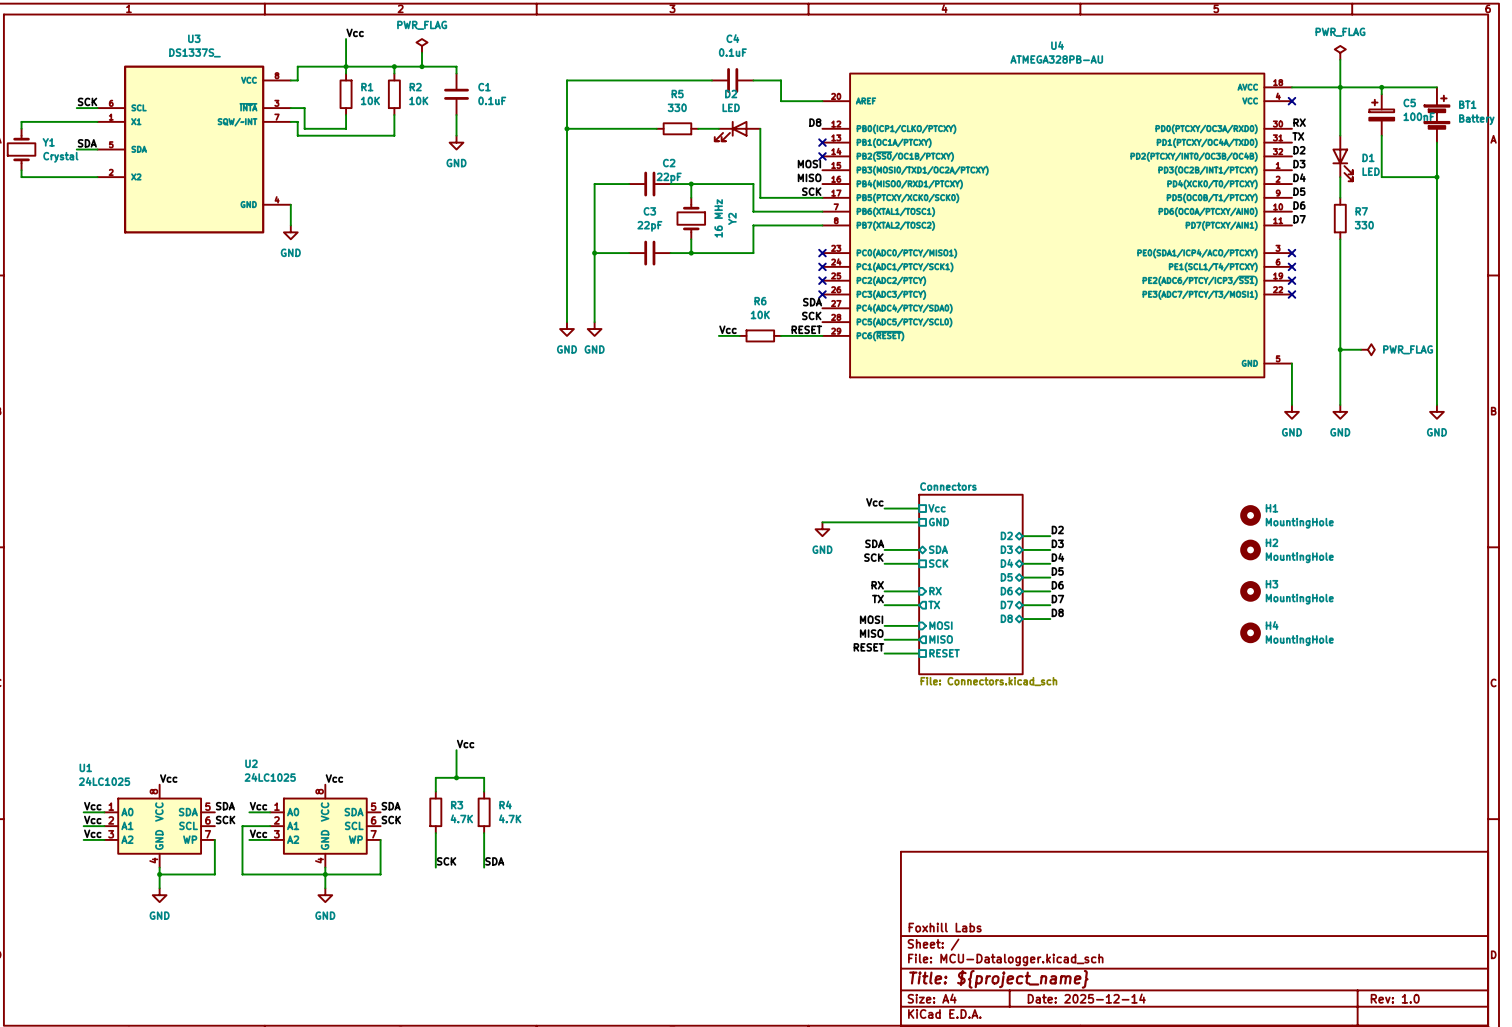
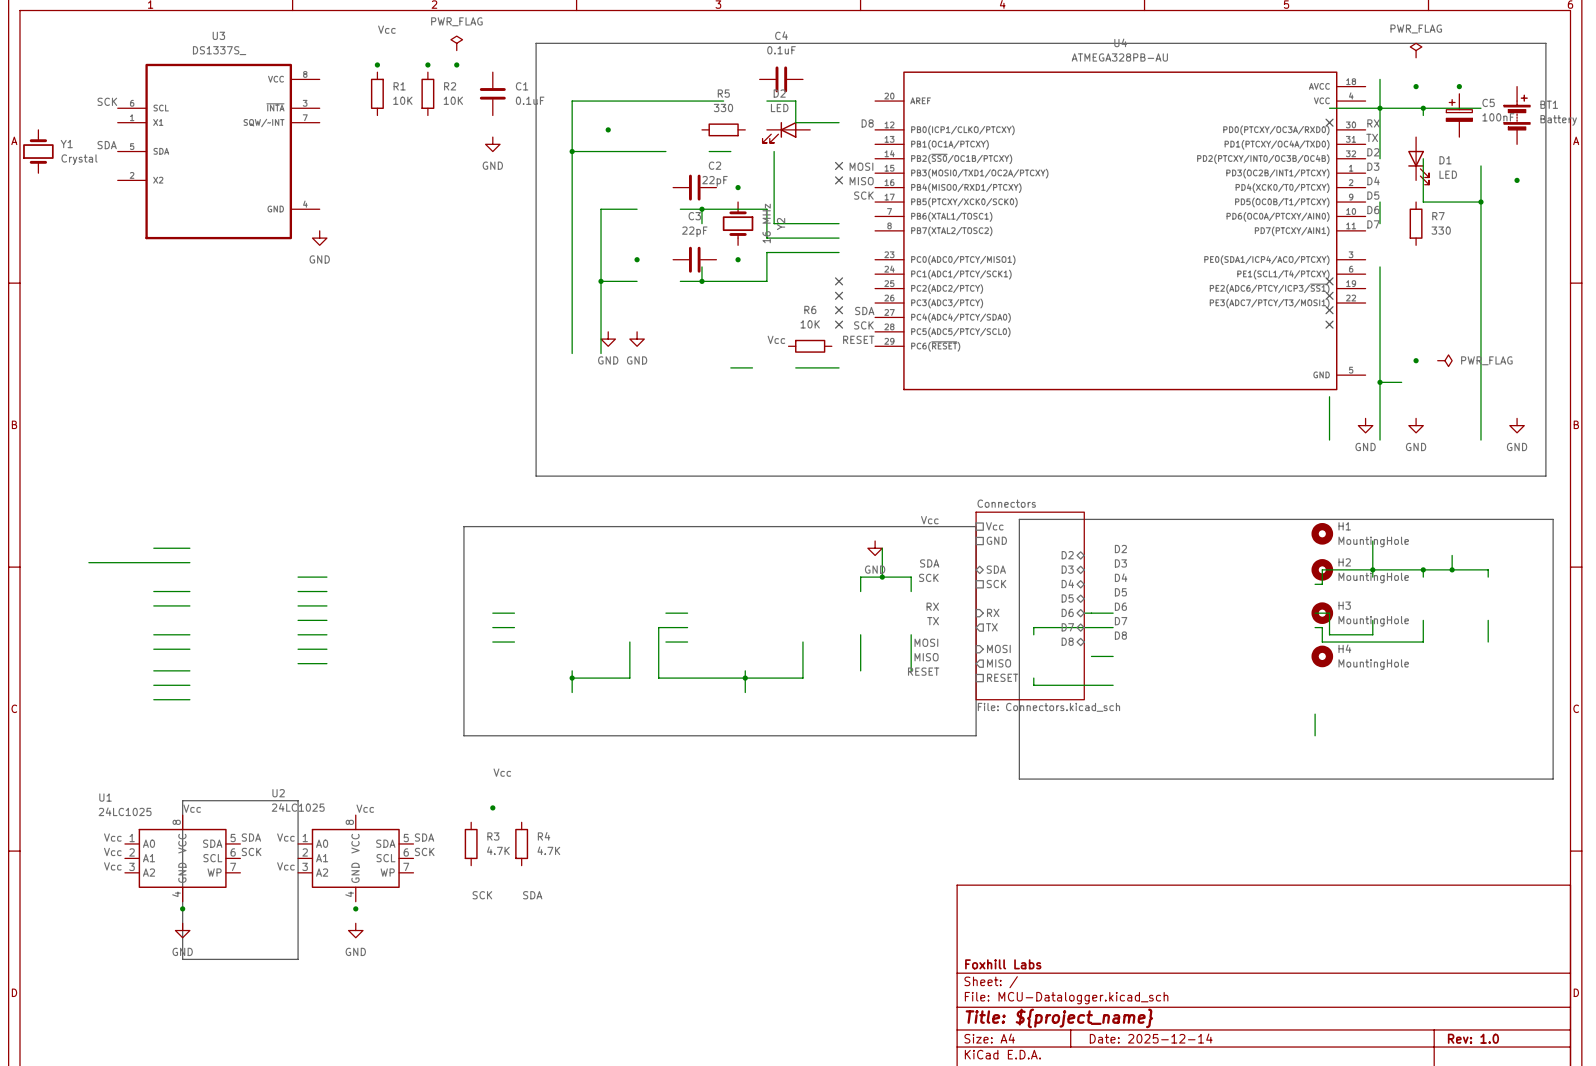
wire: (346, 39) (346, 73) -> none
line: none -> (536, 43) (1545, 43) (1545, 476) (536, 476) (536, 43)
wire: (422, 52) (422, 66) -> none
wire: (1340, 59) (1340, 135) -> (1380, 79) (1380, 158)
wire: (394, 66) (394, 73) -> none
wire: (456, 73) (456, 66) (297, 66) (297, 80) (290, 80) -> none
wire: (711, 80) (566, 80) (566, 322) -> (723, 101) (572, 101) (572, 353)
wire: (753, 80) (781, 80) (781, 101) (822, 101) -> (766, 101) (795, 101) (795, 122) (839, 122)
wire: (1291, 87) (1436, 87) -> (1329, 108) (1480, 108)
wire: (1381, 87) (1381, 94) -> (1423, 108) (1423, 115)
no-connect mark: (1291, 101) -> none
wire: (76, 108) (97, 108) -> none
wire: (290, 108) (304, 108) (304, 128) (346, 128) (346, 114) -> none
junction: none -> (1380, 108)
junction: none -> (1423, 108)
wire: (394, 114) (394, 135) (297, 135) (297, 121) (290, 121) -> none
wire: (456, 114) (456, 135) -> none
wire: (97, 121) (21, 121) (21, 128) -> none
no-connect mark: none -> (1329, 122)
wire: (566, 128) (656, 128) -> (572, 151) (665, 151)
wire: (698, 128) (718, 128) -> (709, 151) (730, 151)
wire: (760, 128) (760, 197) (822, 197) -> (774, 151) (774, 223) (839, 223)
wire: (1381, 135) (1381, 177) (1436, 177) -> (1423, 158) (1423, 202) (1480, 202)
no-connect mark: (822, 142) -> none
wire: (1436, 142) (1436, 404) -> (1480, 165) (1480, 440)
wire: (76, 149) (97, 149) -> none
junction: none -> (572, 151)
no-connect mark: (822, 156) -> none
no-connect mark: none -> (839, 165)
wire: (21, 170) (21, 177) (97, 177) -> none
no-connect mark: none -> (839, 180)
wire: (1340, 177) (1340, 197) -> (1380, 202) (1380, 223)
wire: (629, 184) (594, 184) (594, 322) -> (637, 209) (601, 209) (601, 353)
wire: (670, 184) (753, 184) (753, 211) (822, 211) -> (680, 209) (766, 209) (766, 238) (839, 238)
wire: (691, 184) (691, 197) -> (701, 209) (701, 223)
junction: none -> (1480, 202)
wire: (290, 204) (290, 225) -> none
junction: none -> (701, 209)
wire: (822, 225) (753, 225) (753, 253) (670, 253) -> (839, 252) (766, 252) (766, 281) (680, 281)
wire: (691, 239) (691, 253) -> (701, 266) (701, 281)
wire: (1340, 239) (1340, 404) -> (1380, 266) (1380, 440)
wire: (594, 253) (629, 253) -> (601, 281) (637, 281)
no-connect mark: (822, 253) -> none
no-connect mark: (1291, 253) -> none
no-connect mark: (822, 266) -> none
no-connect mark: (1291, 266) -> none
junction: none -> (601, 281)
junction: none -> (701, 281)
no-connect mark: none -> (839, 281)
no-connect mark: none -> (1329, 281)
no-connect mark: (822, 280) -> none
no-connect mark: (1291, 280) -> none
no-connect mark: none -> (839, 295)
no-connect mark: none -> (1329, 295)
no-connect mark: (822, 294) -> none
no-connect mark: (1291, 294) -> none
no-connect mark: none -> (839, 310)
no-connect mark: none -> (1329, 310)
no-connect mark: none -> (839, 324)
no-connect mark: none -> (1329, 324)
wire: (718, 335) (739, 335) -> (730, 367) (752, 367)
wire: (781, 335) (822, 335) -> (795, 367) (839, 367)
wire: (1340, 349) (1361, 349) -> (1380, 382) (1401, 382)
wire: (1291, 363) (1291, 404) -> (1329, 396) (1329, 440)
junction: none -> (1380, 382)
line: none -> (1019, 519) (1553, 519) (1553, 779) (1019, 779) (1019, 519)
line: none -> (463, 526) (976, 526) (976, 735) (463, 735) (463, 526)
wire: (822, 522) (919, 522) -> none
wire: none -> (1372, 541) (1372, 577)
wire: none -> (153, 548) (189, 548)
wire: none -> (882, 548) (882, 577)
wire: (1022, 536) (1050, 536) -> none
wire: none -> (1452, 555) (1452, 569)
wire: none -> (88, 562) (189, 562)
wire: (884, 549) (919, 549) -> none
wire: (1022, 549) (1050, 549) -> none
junction: none -> (1372, 569)
wire: none -> (1423, 569) (1423, 577)
junction: none -> (1423, 569)
junction: none -> (1452, 569)
wire: none -> (298, 577) (326, 577)
junction: none -> (882, 577)
wire: none -> (1488, 577) (1488, 569) (1322, 569) (1322, 584) (1315, 584)
wire: (884, 563) (919, 563) -> none
wire: (1022, 563) (1050, 563) -> none
wire: none -> (153, 591) (189, 591)
wire: none -> (298, 591) (326, 591)
wire: none -> (860, 591) (860, 577) (911, 577) (911, 591)
wire: (1022, 577) (1050, 577) -> none
wire: none -> (153, 605) (189, 605)
wire: none -> (298, 605) (326, 605)
wire: none -> (492, 613) (514, 613)
wire: none -> (665, 613) (687, 613)
wire: (884, 591) (919, 591) -> none
wire: none -> (1315, 613) (1329, 613) (1329, 634) (1372, 634) (1372, 620)
wire: none -> (298, 620) (326, 620)
wire: none -> (1423, 620) (1423, 642) (1322, 642) (1322, 627) (1315, 627)
wire: none -> (1488, 620) (1488, 642)
wire: none -> (492, 627) (514, 627)
wire: none -> (687, 627) (658, 627) (658, 678) (802, 678) (802, 642)
wire: (884, 605) (919, 605) -> none
wire: none -> (1084, 627) (1033, 627) (1033, 634)
wire: none -> (153, 634) (189, 634)
wire: none -> (298, 634) (326, 634)
wire: none -> (860, 634) (860, 670)
wire: none -> (911, 634) (911, 670)
wire: none -> (492, 642) (514, 642)
wire: none -> (629, 642) (629, 678) (572, 678)
wire: none -> (665, 642) (687, 642)
wire: (1022, 619) (1050, 619) -> none
wire: none -> (153, 649) (189, 649)
wire: none -> (298, 649) (326, 649)
wire: (884, 625) (919, 625) -> none
wire: none -> (1091, 656) (1113, 656)
wire: none -> (298, 663) (326, 663)
wire: (884, 639) (919, 639) -> none
wire: none -> (153, 670) (189, 670)
wire: none -> (572, 670) (572, 692)
wire: none -> (745, 670) (745, 692)
junction: none -> (572, 678)
junction: none -> (745, 678)
wire: (884, 653) (919, 653) -> none
wire: none -> (1033, 678) (1033, 685) (1113, 685)
wire: none -> (153, 685) (189, 685)
wire: none -> (153, 699) (189, 699)
wire: none -> (1315, 714) (1315, 735)
wire: (456, 750) (456, 777) -> none
line: none -> (182, 800) (298, 800) (298, 959) (182, 959) (182, 800)
wire: (435, 791) (435, 777) (484, 777) (484, 791) -> none
wire: (83, 812) (104, 812) -> none
wire: (249, 812) (270, 812) -> none
wire: (83, 826) (104, 826) -> none
wire: (270, 826) (242, 826) (242, 874) (380, 874) (380, 839) -> none
wire: (435, 833) (435, 867) -> none
wire: (484, 833) (484, 867) -> none
wire: (83, 839) (104, 839) -> none
wire: (214, 839) (214, 874) (159, 874) -> none
wire: (249, 839) (270, 839) -> none
wire: (325, 867) (325, 888) -> none

